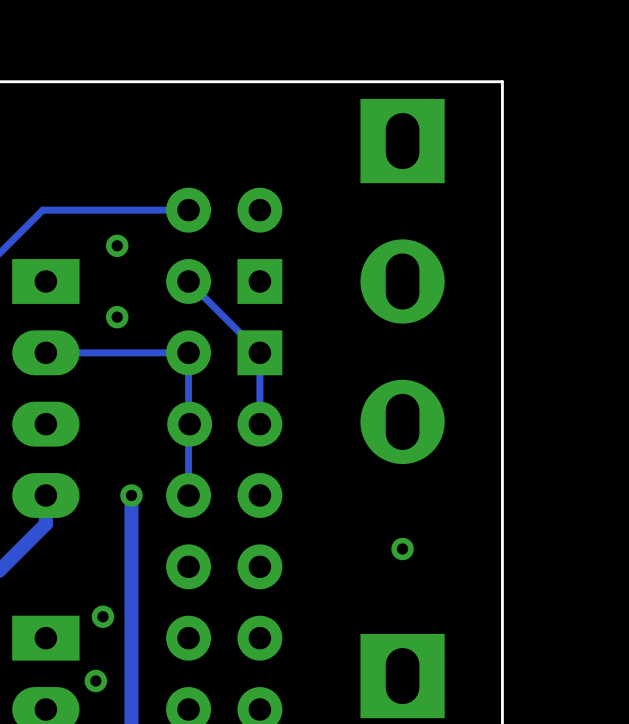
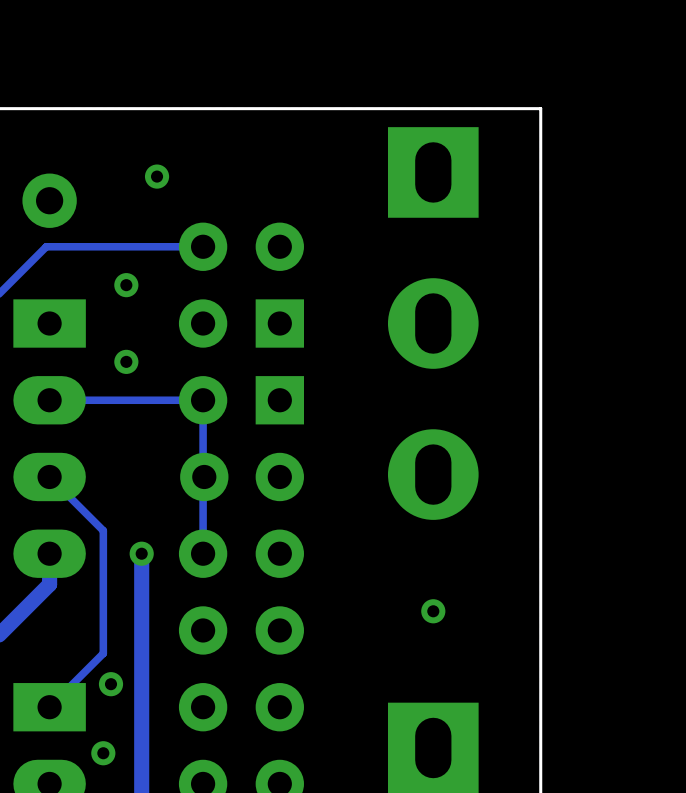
via: none -> (157, 176)
part: none -> (49, 200)
track: (188, 281) (259, 352) (259, 424) -> none
track: none -> (49, 476) (103, 530) (103, 653) (49, 707)

